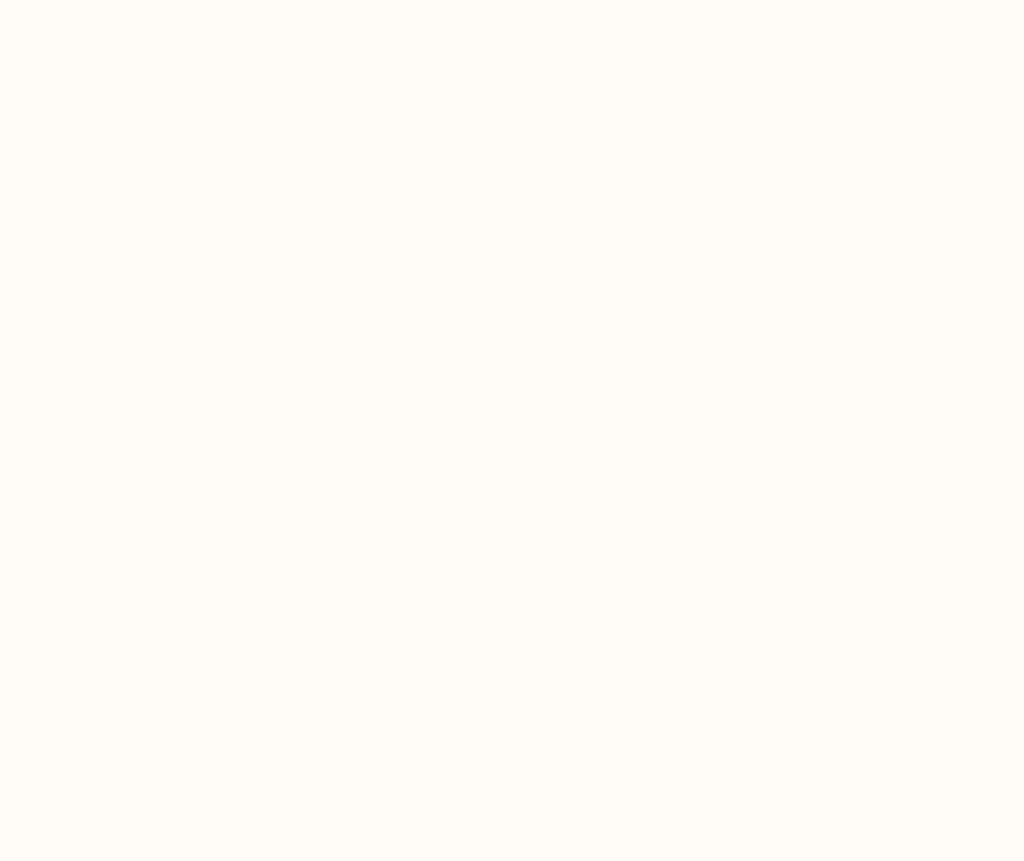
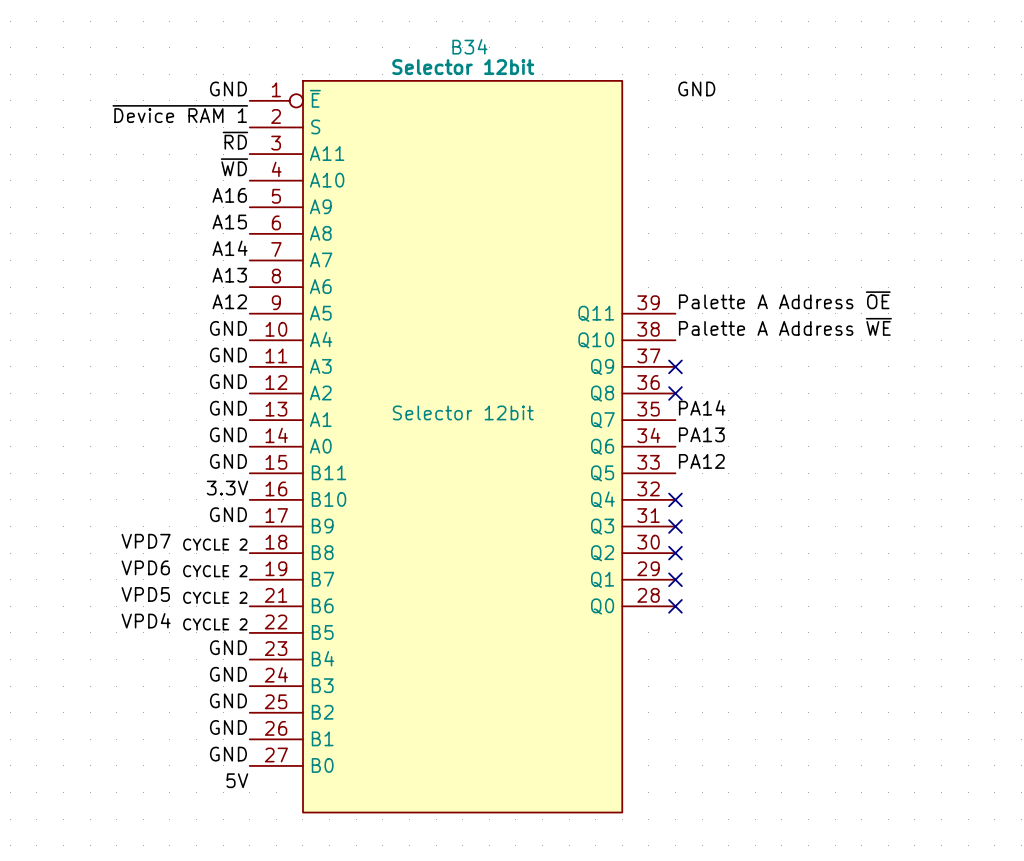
label: none -> GND (228, 88)
label: none -> GND (696, 88)
label: none -> ~{Device RAM 1} (180, 114)
label: none -> ~{RD} (235, 140)
label: none -> ~{WD} (234, 167)
label: none -> A16 (229, 195)
label: none -> A15 (229, 221)
label: none -> A14 (230, 248)
label: none -> A13 (229, 275)
label: none -> Palette A Address ~{OE} (784, 300)
label: none -> A12 (229, 301)
label: none -> Palette A Address ~{WE} (785, 326)
label: none -> GND (228, 328)
label: none -> GND (228, 355)
no-connect mark: none -> (675, 366)
label: none -> GND (228, 381)
no-connect mark: none -> (675, 393)
label: none -> GND (228, 408)
label: none -> PA14 (702, 407)
label: none -> GND (228, 434)
label: none -> PA13 (701, 434)
B34: none -> Selector 12bit (462, 446)
label: none -> GND (228, 461)
label: none -> PA12 (701, 461)
label: none -> 3.3V (227, 488)
no-connect mark: none -> (675, 499)
label: none -> GND (228, 514)
no-connect mark: none -> (675, 526)
label: none -> VPD7 CYCLE 2 (184, 542)
no-connect mark: none -> (675, 553)
label: none -> VPD6 CYCLE 2 (184, 568)
no-connect mark: none -> (675, 579)
label: none -> VPD5 CYCLE 2 (184, 595)
no-connect mark: none -> (675, 606)
label: none -> VPD4 CYCLE 2 (184, 621)
label: none -> GND (228, 647)
label: none -> GND (228, 674)
label: none -> GND (228, 700)
label: none -> GND (228, 727)
label: none -> GND (228, 754)
label: none -> 5V (237, 780)

